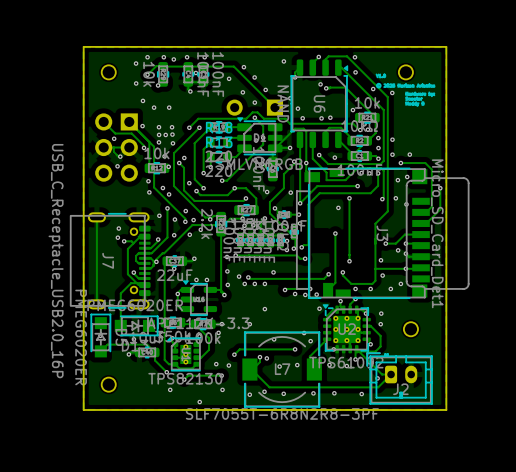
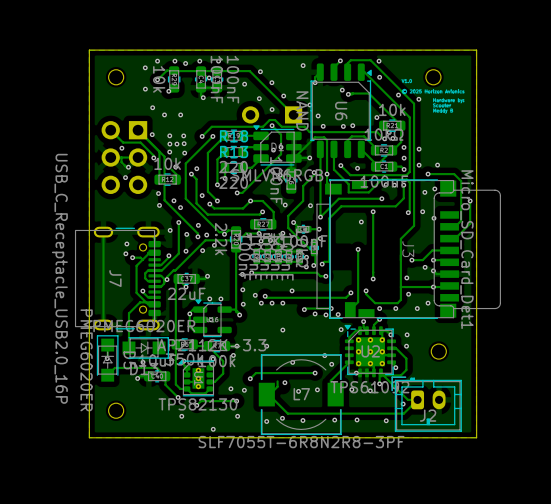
track: none -> (171, 169) (176, 174) (176, 179)
via: (168, 166) -> none
via: (259, 357) -> none

